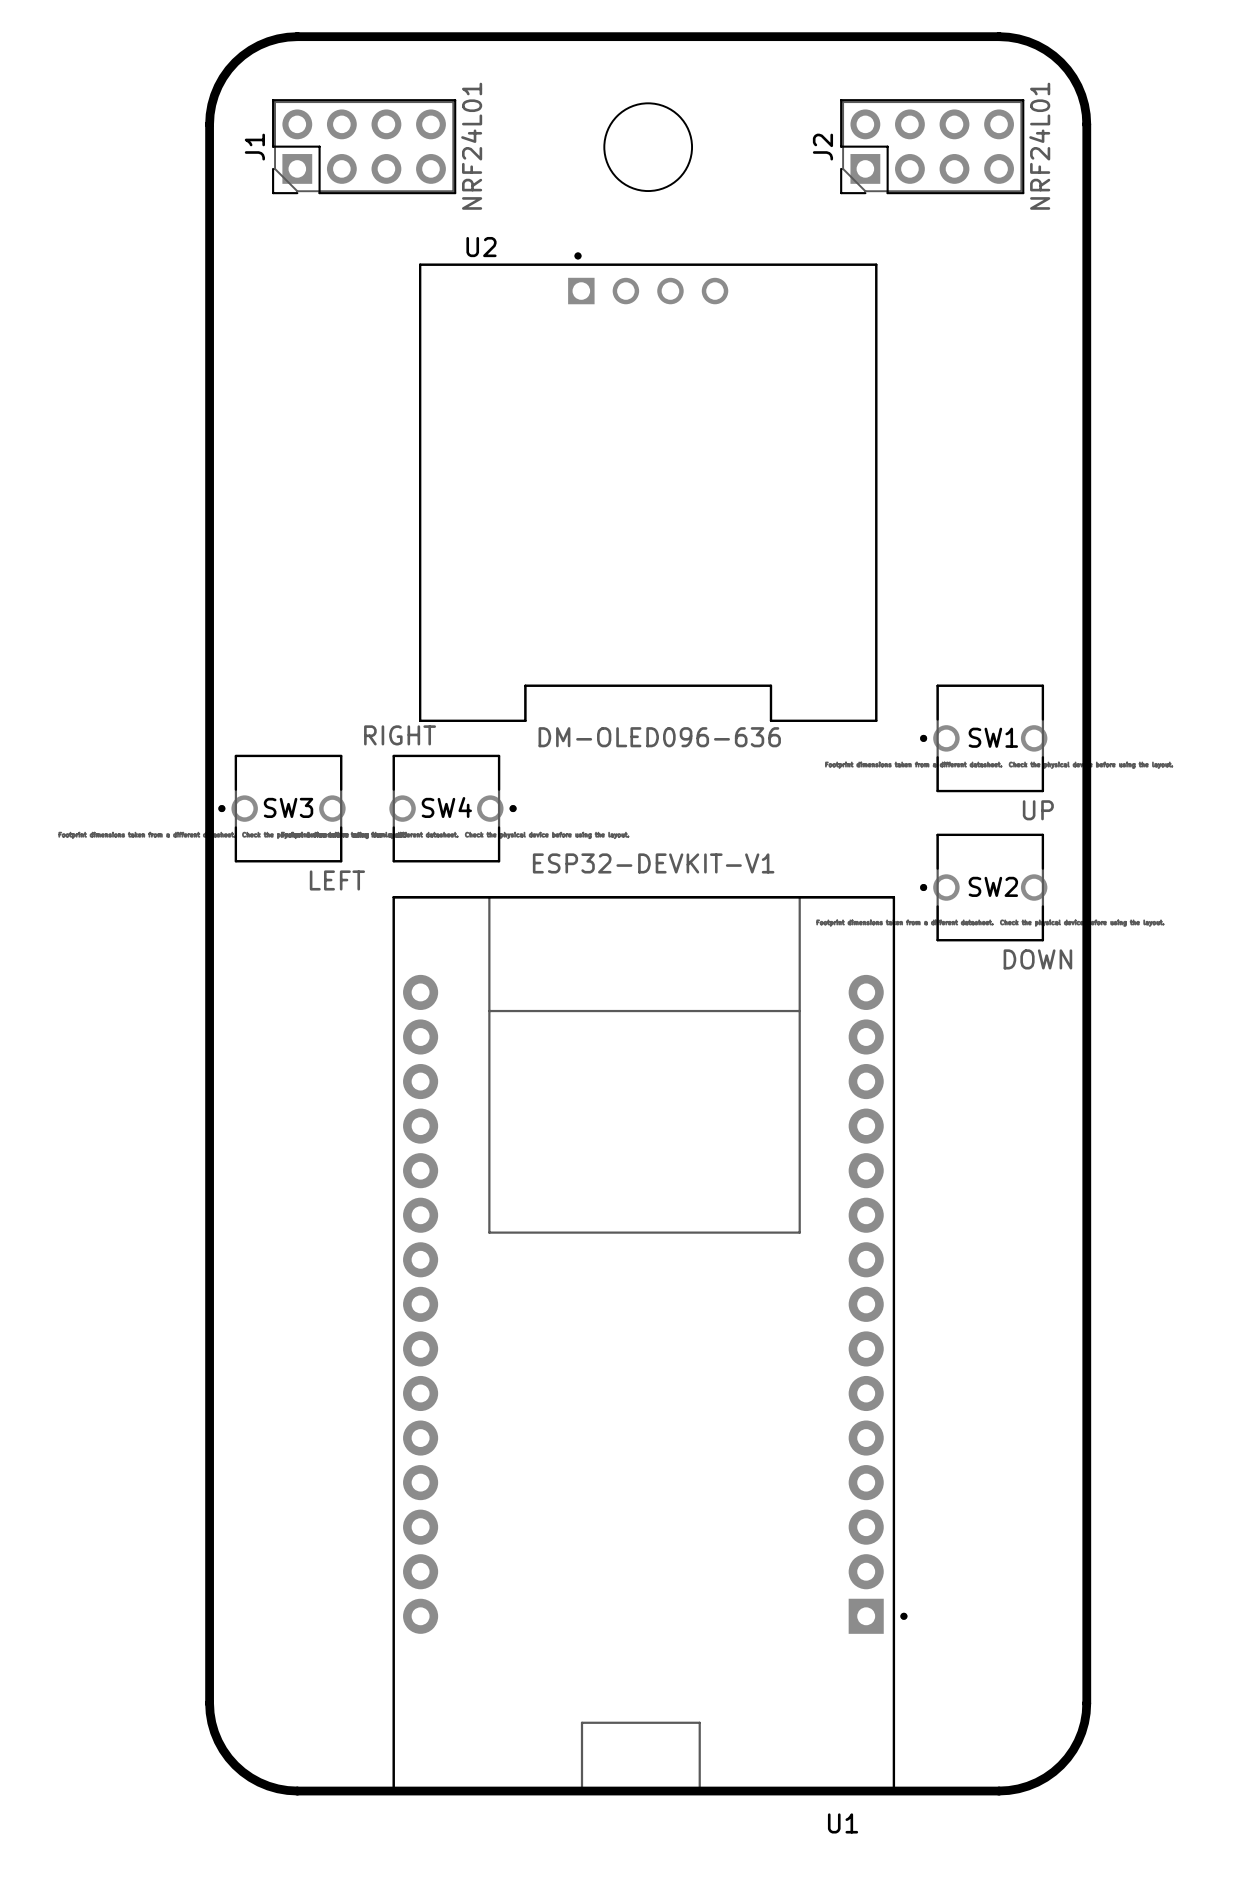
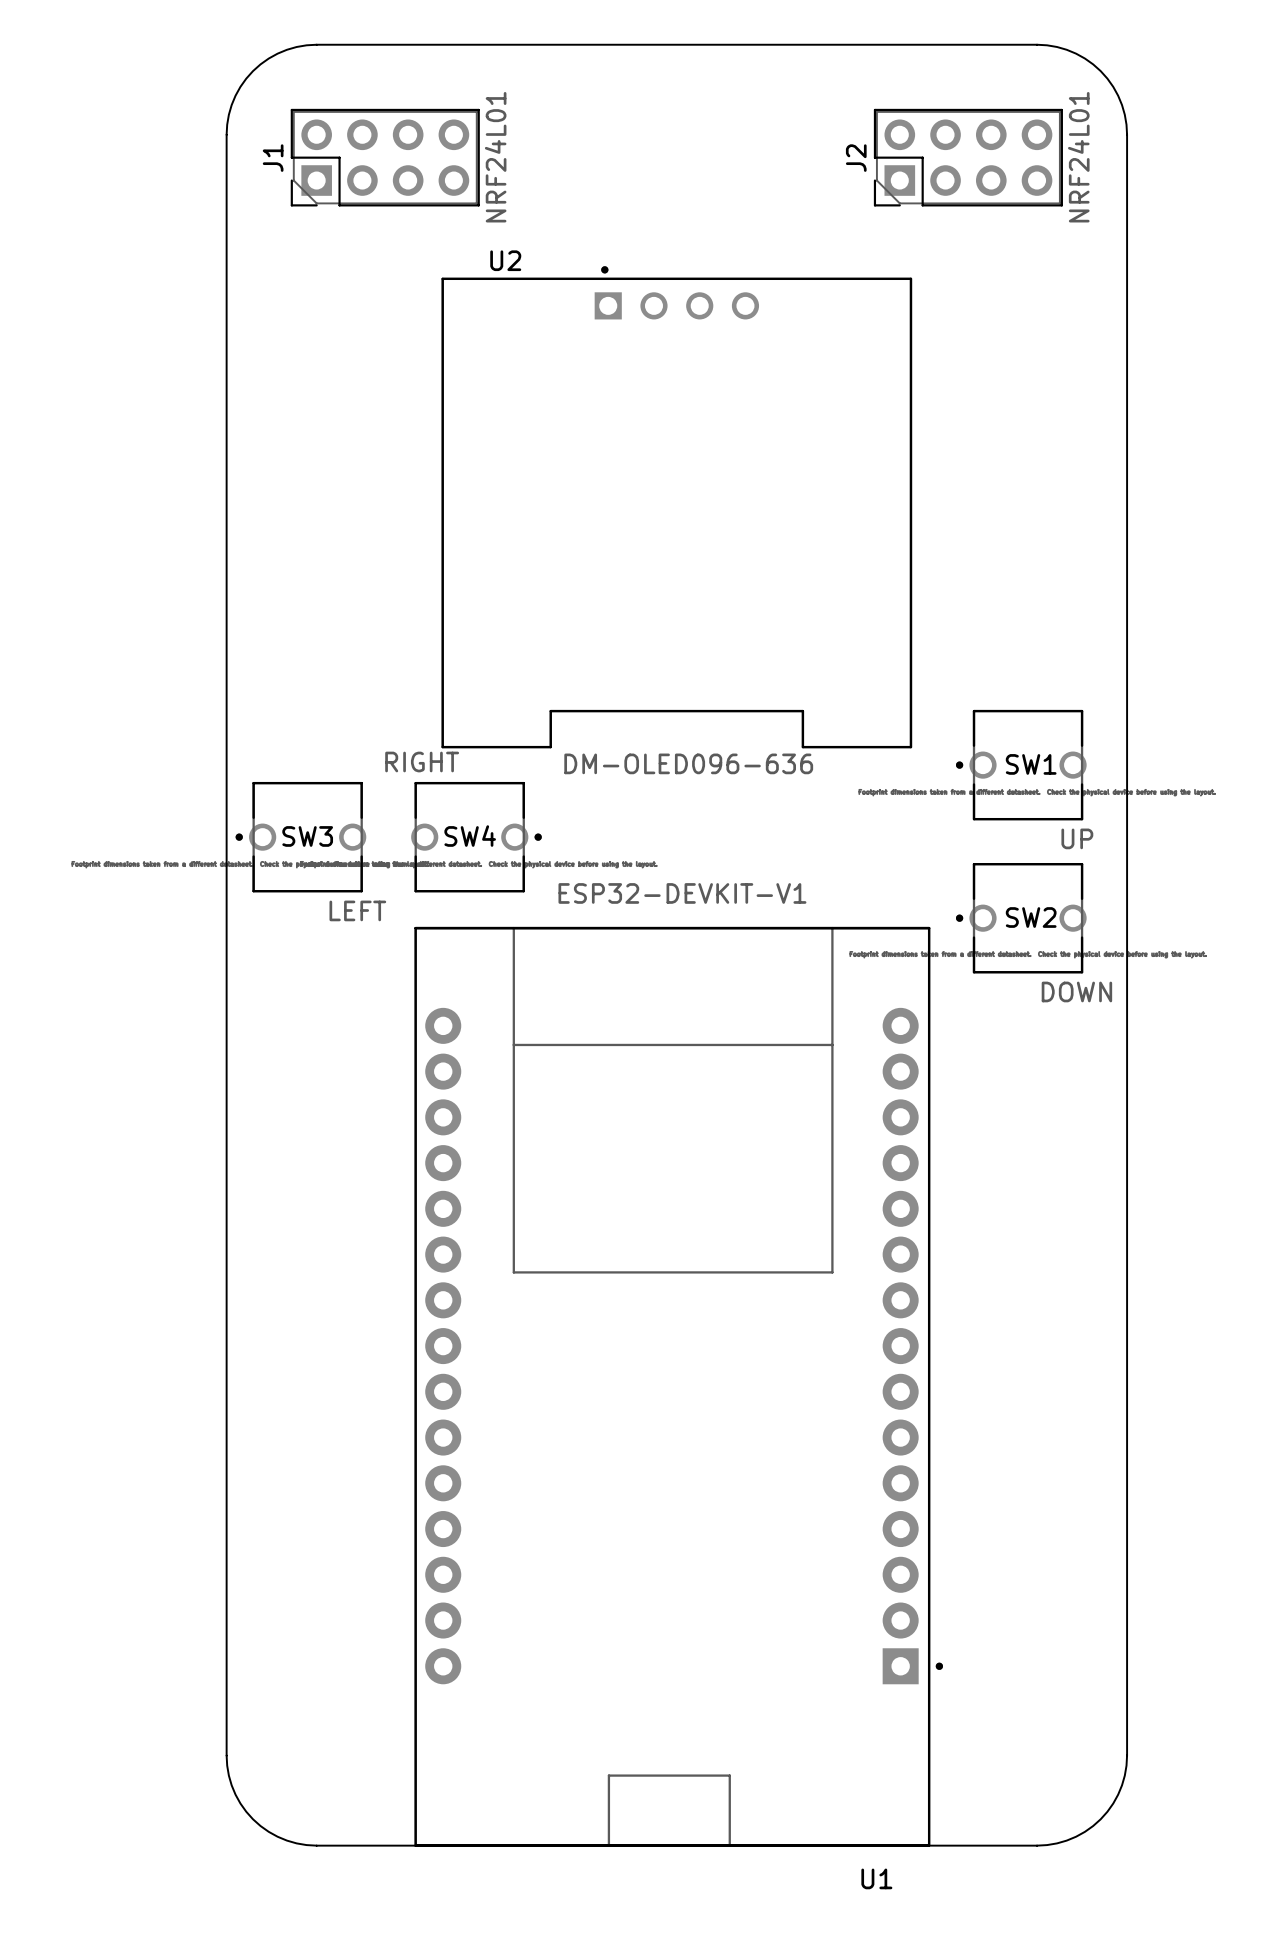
line: (297, 36) (1008, 37) (1028, 41) (1053, 55) (1067, 69) (1078, 86) (1084, 104) (1086, 124) (1086, 1703) (1084, 1722) (1073, 1749) (1053, 1771) (1037, 1782) (1018, 1788) (999, 1791) (297, 1791) (277, 1788) (250, 1777) (235, 1765) (218, 1741) (211, 1722) (209, 1703) (209, 124) (214, 95) (223, 77) (235, 62) (250, 50) (268, 41) (297, 36) -> none
round board edge: [603, 102, 693, 192] -> none

